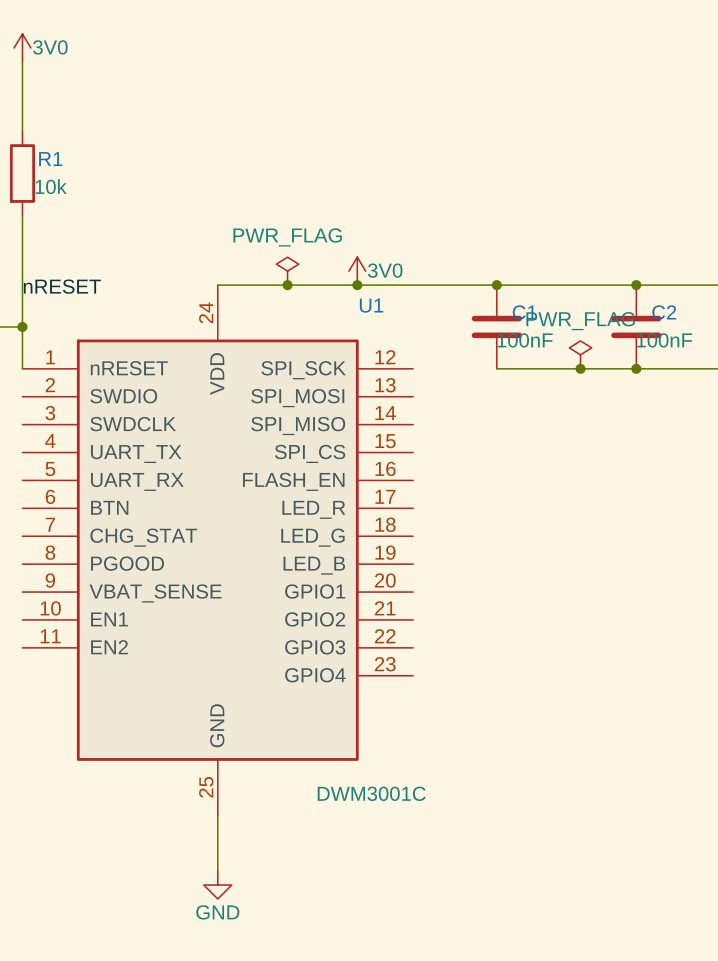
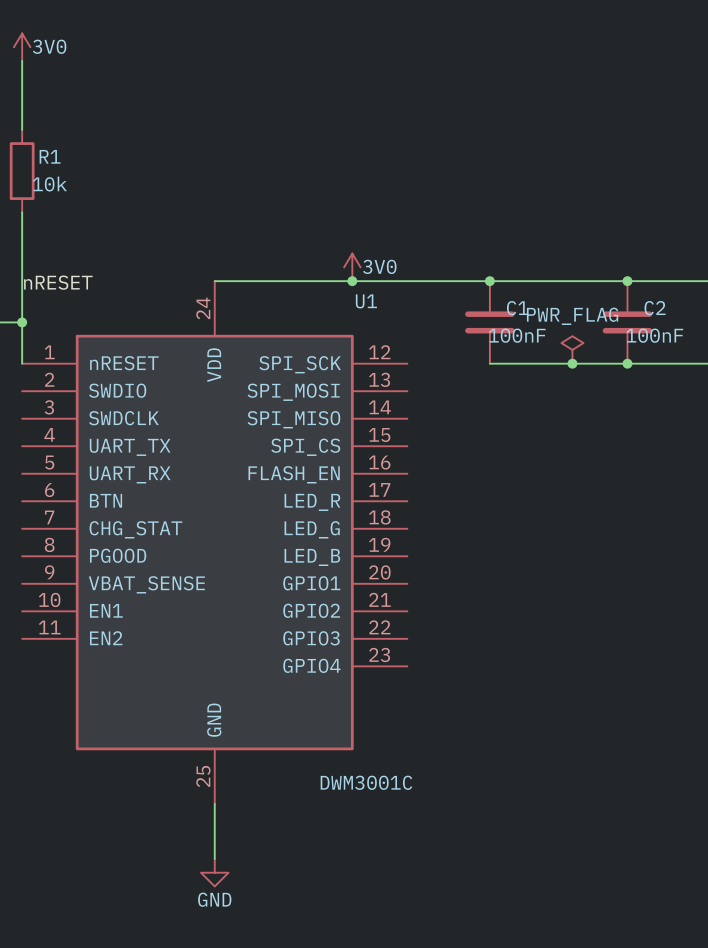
power symbol: PWR_FLAG (287, 271) -> none
junction: (287, 285) -> none

